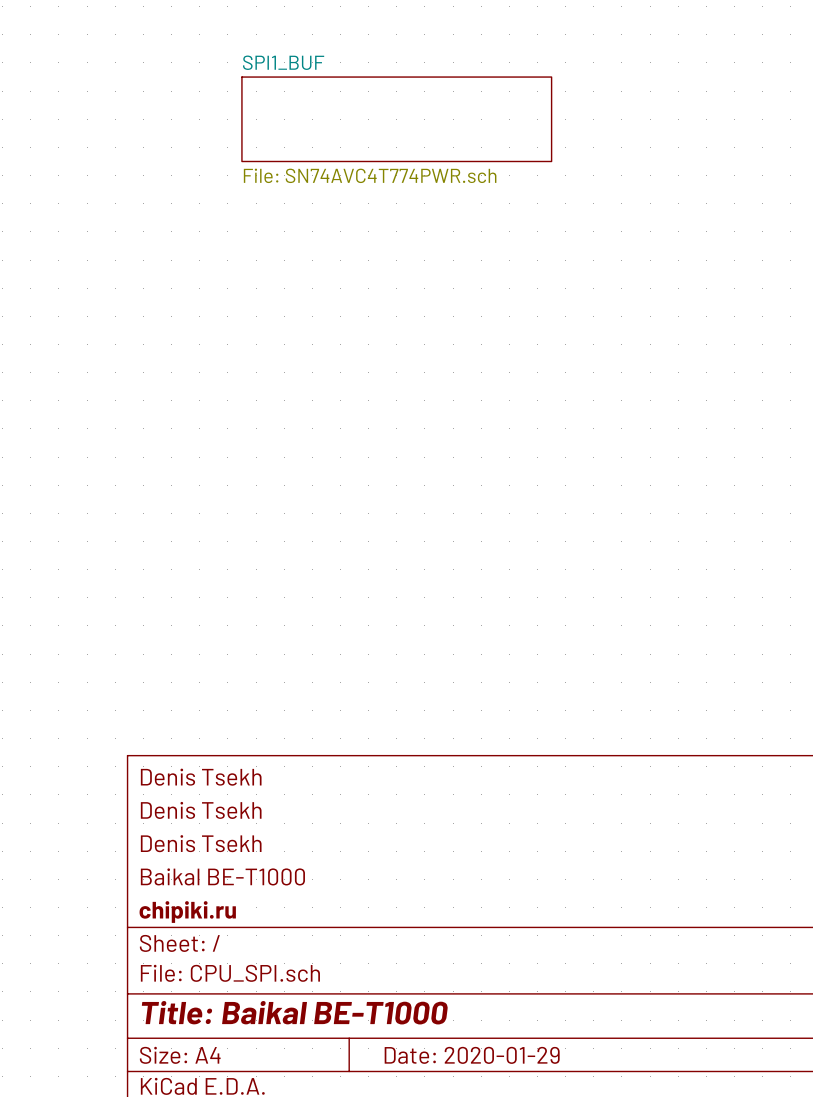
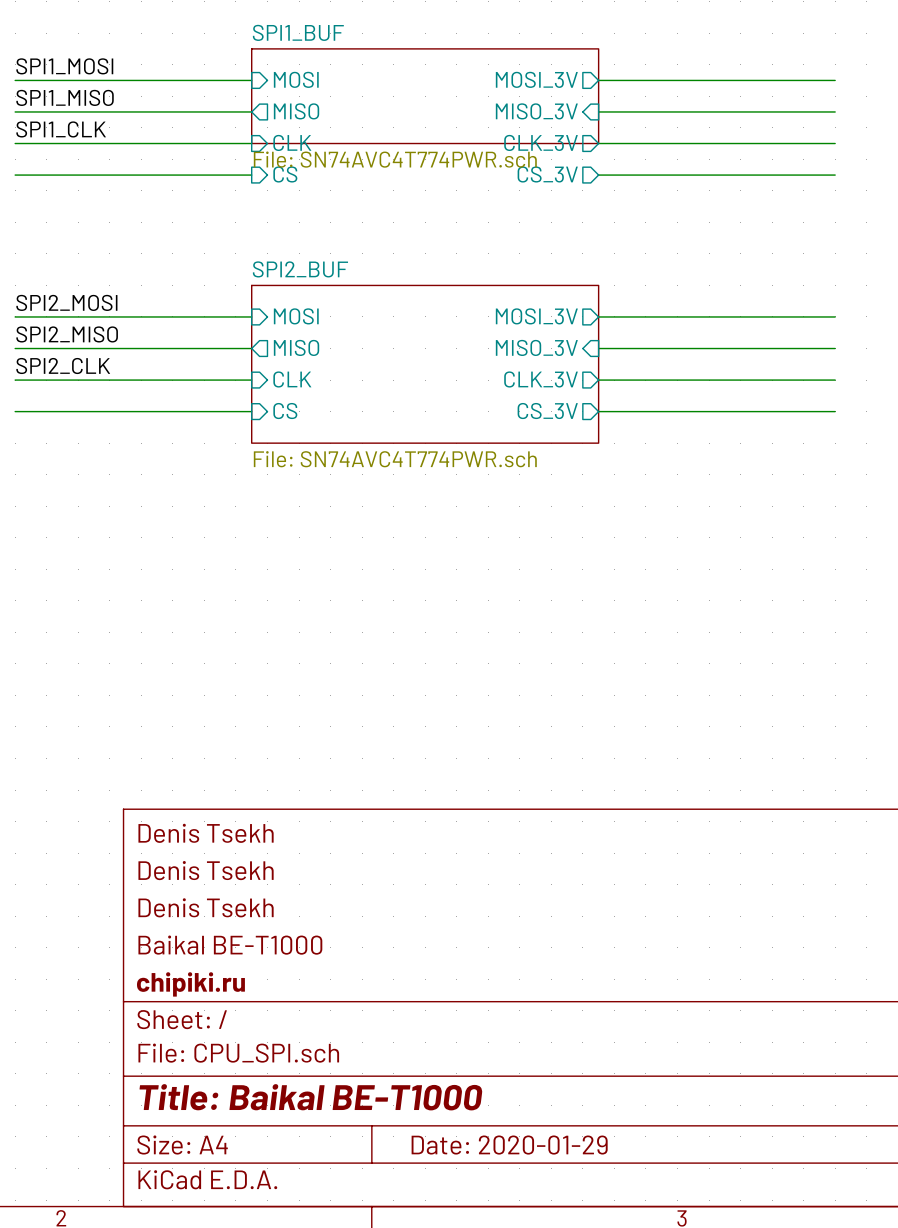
label: none -> SPI1_MOSI (64, 66)
sheet pin: none -> MOSI (296, 79)
sheet pin: none -> MOSI_3V (536, 79)
wire: none -> (15, 80) (251, 80)
wire: none -> (598, 80) (835, 80)
label: none -> SPI1_MISO (65, 97)
sheet pin: none -> MISO (296, 111)
sheet pin: none -> MISO_3V (536, 111)
wire: none -> (15, 111) (251, 111)
wire: none -> (598, 111) (835, 111)
label: none -> SPI1_CLK (61, 129)
sheet pin: none -> CLK (292, 142)
sheet pin: none -> CLK_3V (541, 142)
wire: none -> (15, 143) (251, 143)
wire: none -> (598, 143) (835, 143)
wire: none -> (15, 175) (251, 175)
sheet pin: none -> CS (285, 174)
sheet pin: none -> CS_3V (547, 174)
wire: none -> (598, 175) (835, 175)
label: none -> SPI2_MOSI (66, 302)
sheet pin: none -> MOSI (296, 316)
sheet pin: none -> MOSI_3V (536, 316)
wire: none -> (15, 316) (251, 316)
wire: none -> (598, 316) (835, 316)
label: none -> SPI2_MISO (67, 334)
sheet pin: none -> MISO (296, 347)
sheet pin: none -> MISO_3V (536, 347)
wire: none -> (15, 348) (251, 348)
wire: none -> (598, 348) (835, 348)
sheet SPI2_BUF: none -> File: SN74AVC4T774PWR.sch (425, 364)
label: none -> SPI2_CLK (63, 366)
wire: none -> (15, 380) (251, 380)
sheet pin: none -> CLK (292, 379)
sheet pin: none -> CLK_3V (541, 379)
wire: none -> (598, 380) (835, 380)
wire: none -> (15, 411) (251, 411)
sheet pin: none -> CS (285, 411)
sheet pin: none -> CS_3V (547, 411)
wire: none -> (598, 411) (835, 411)

